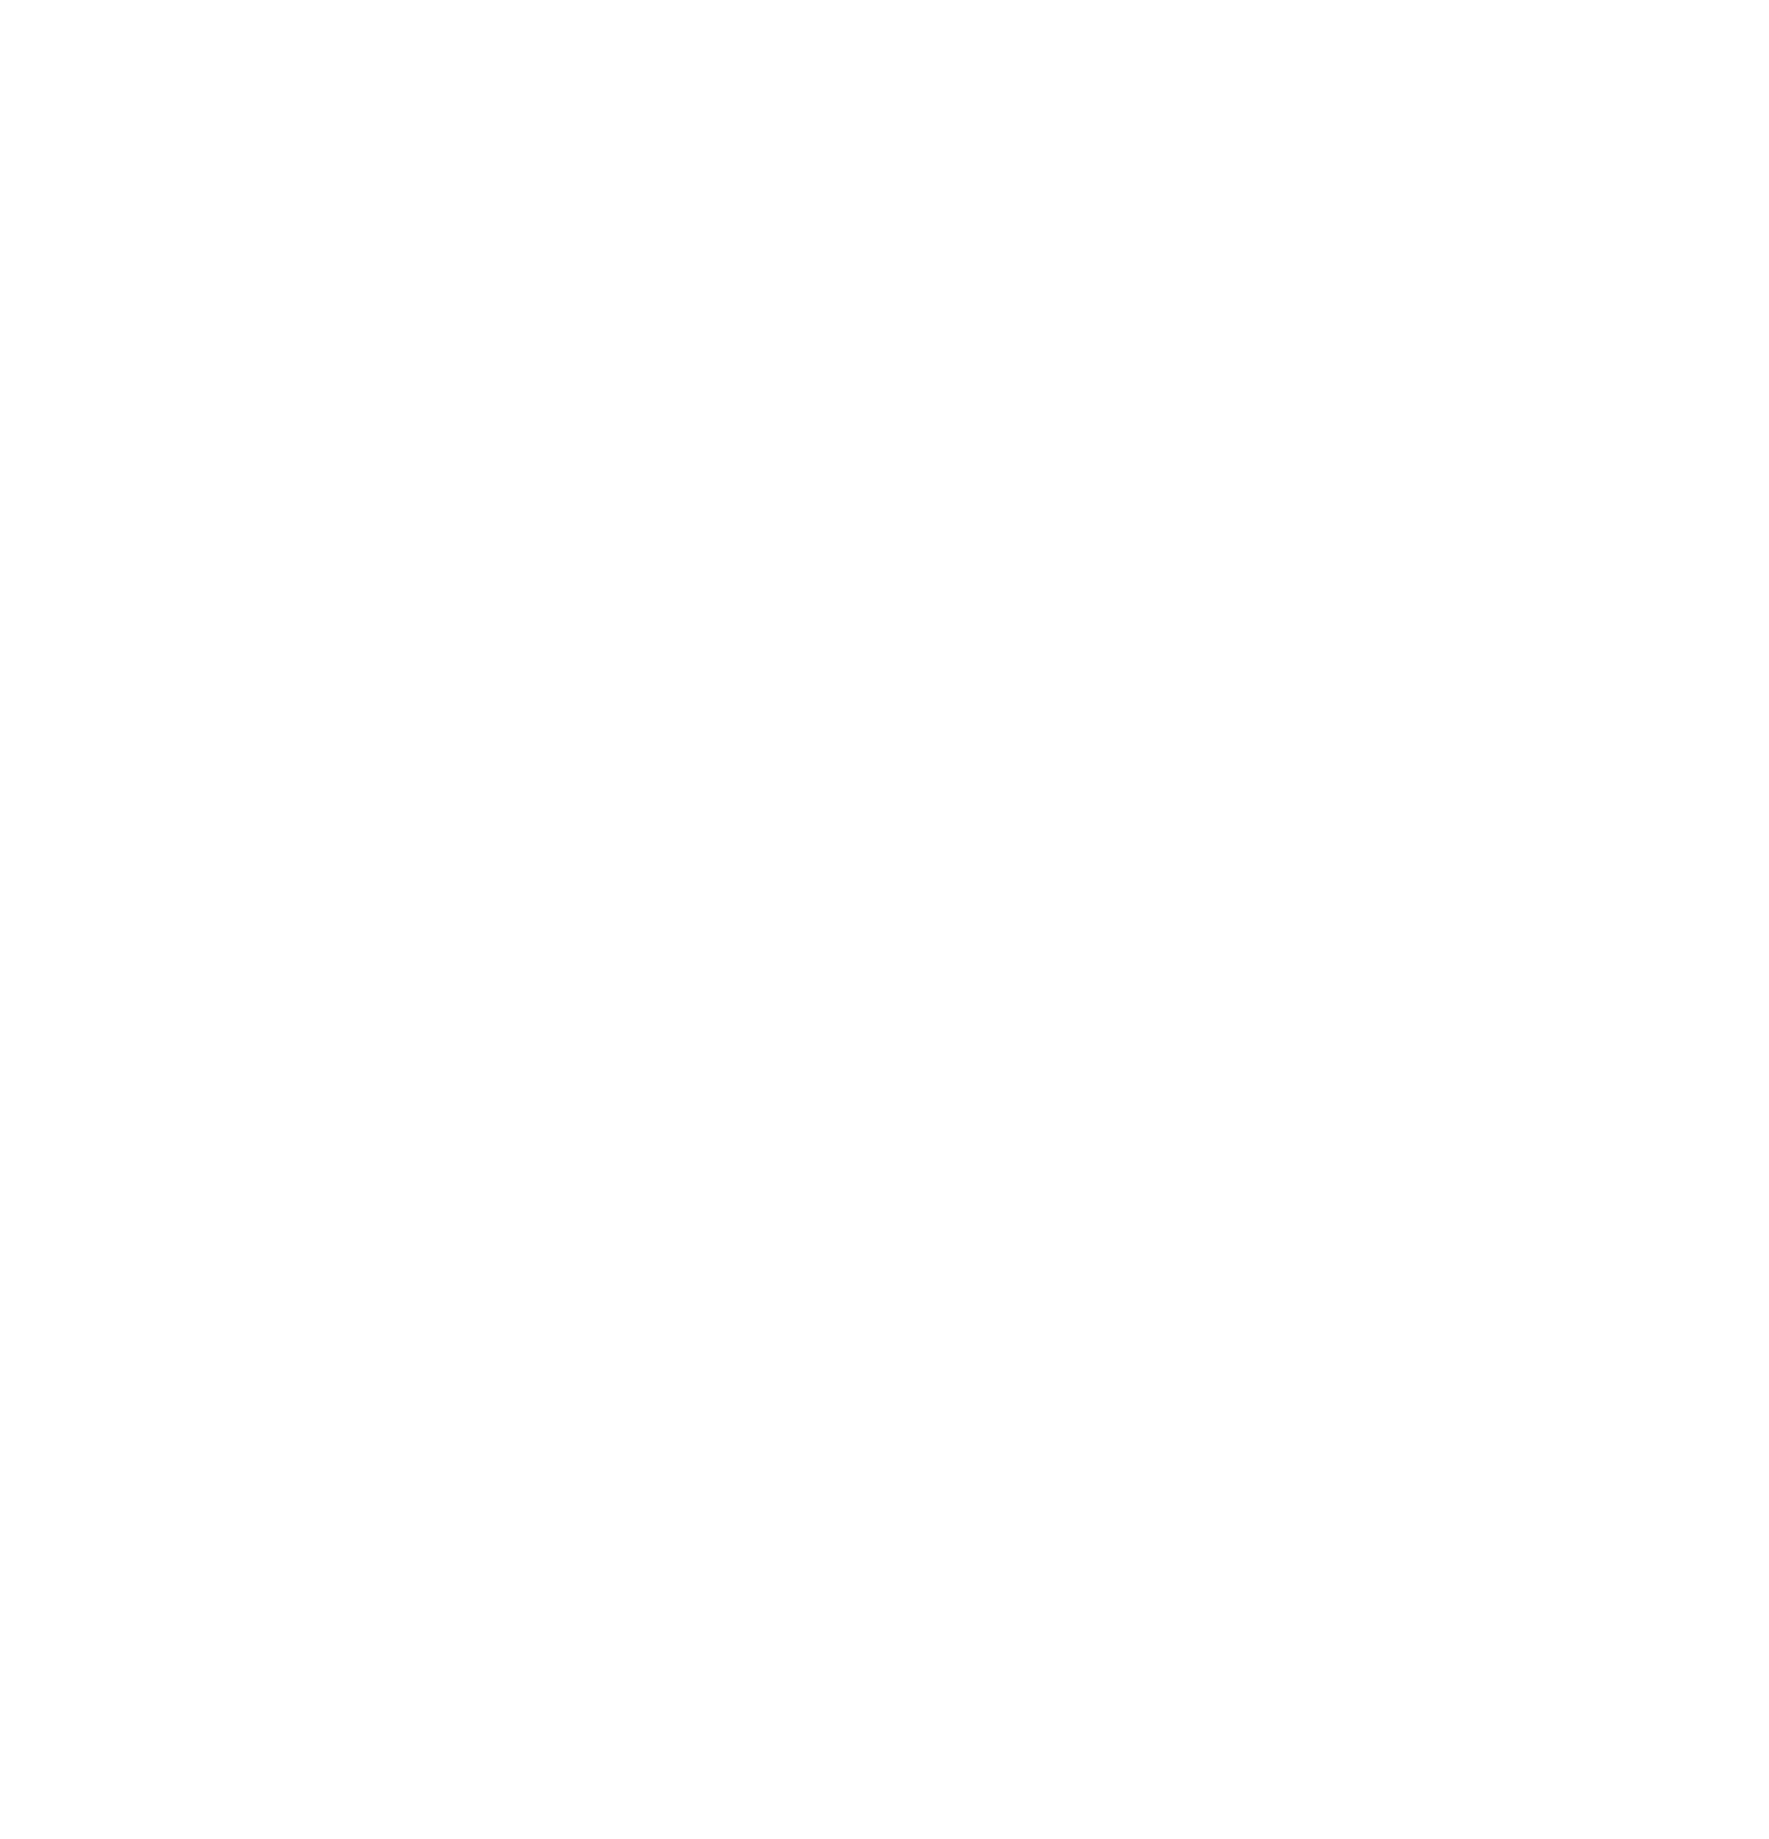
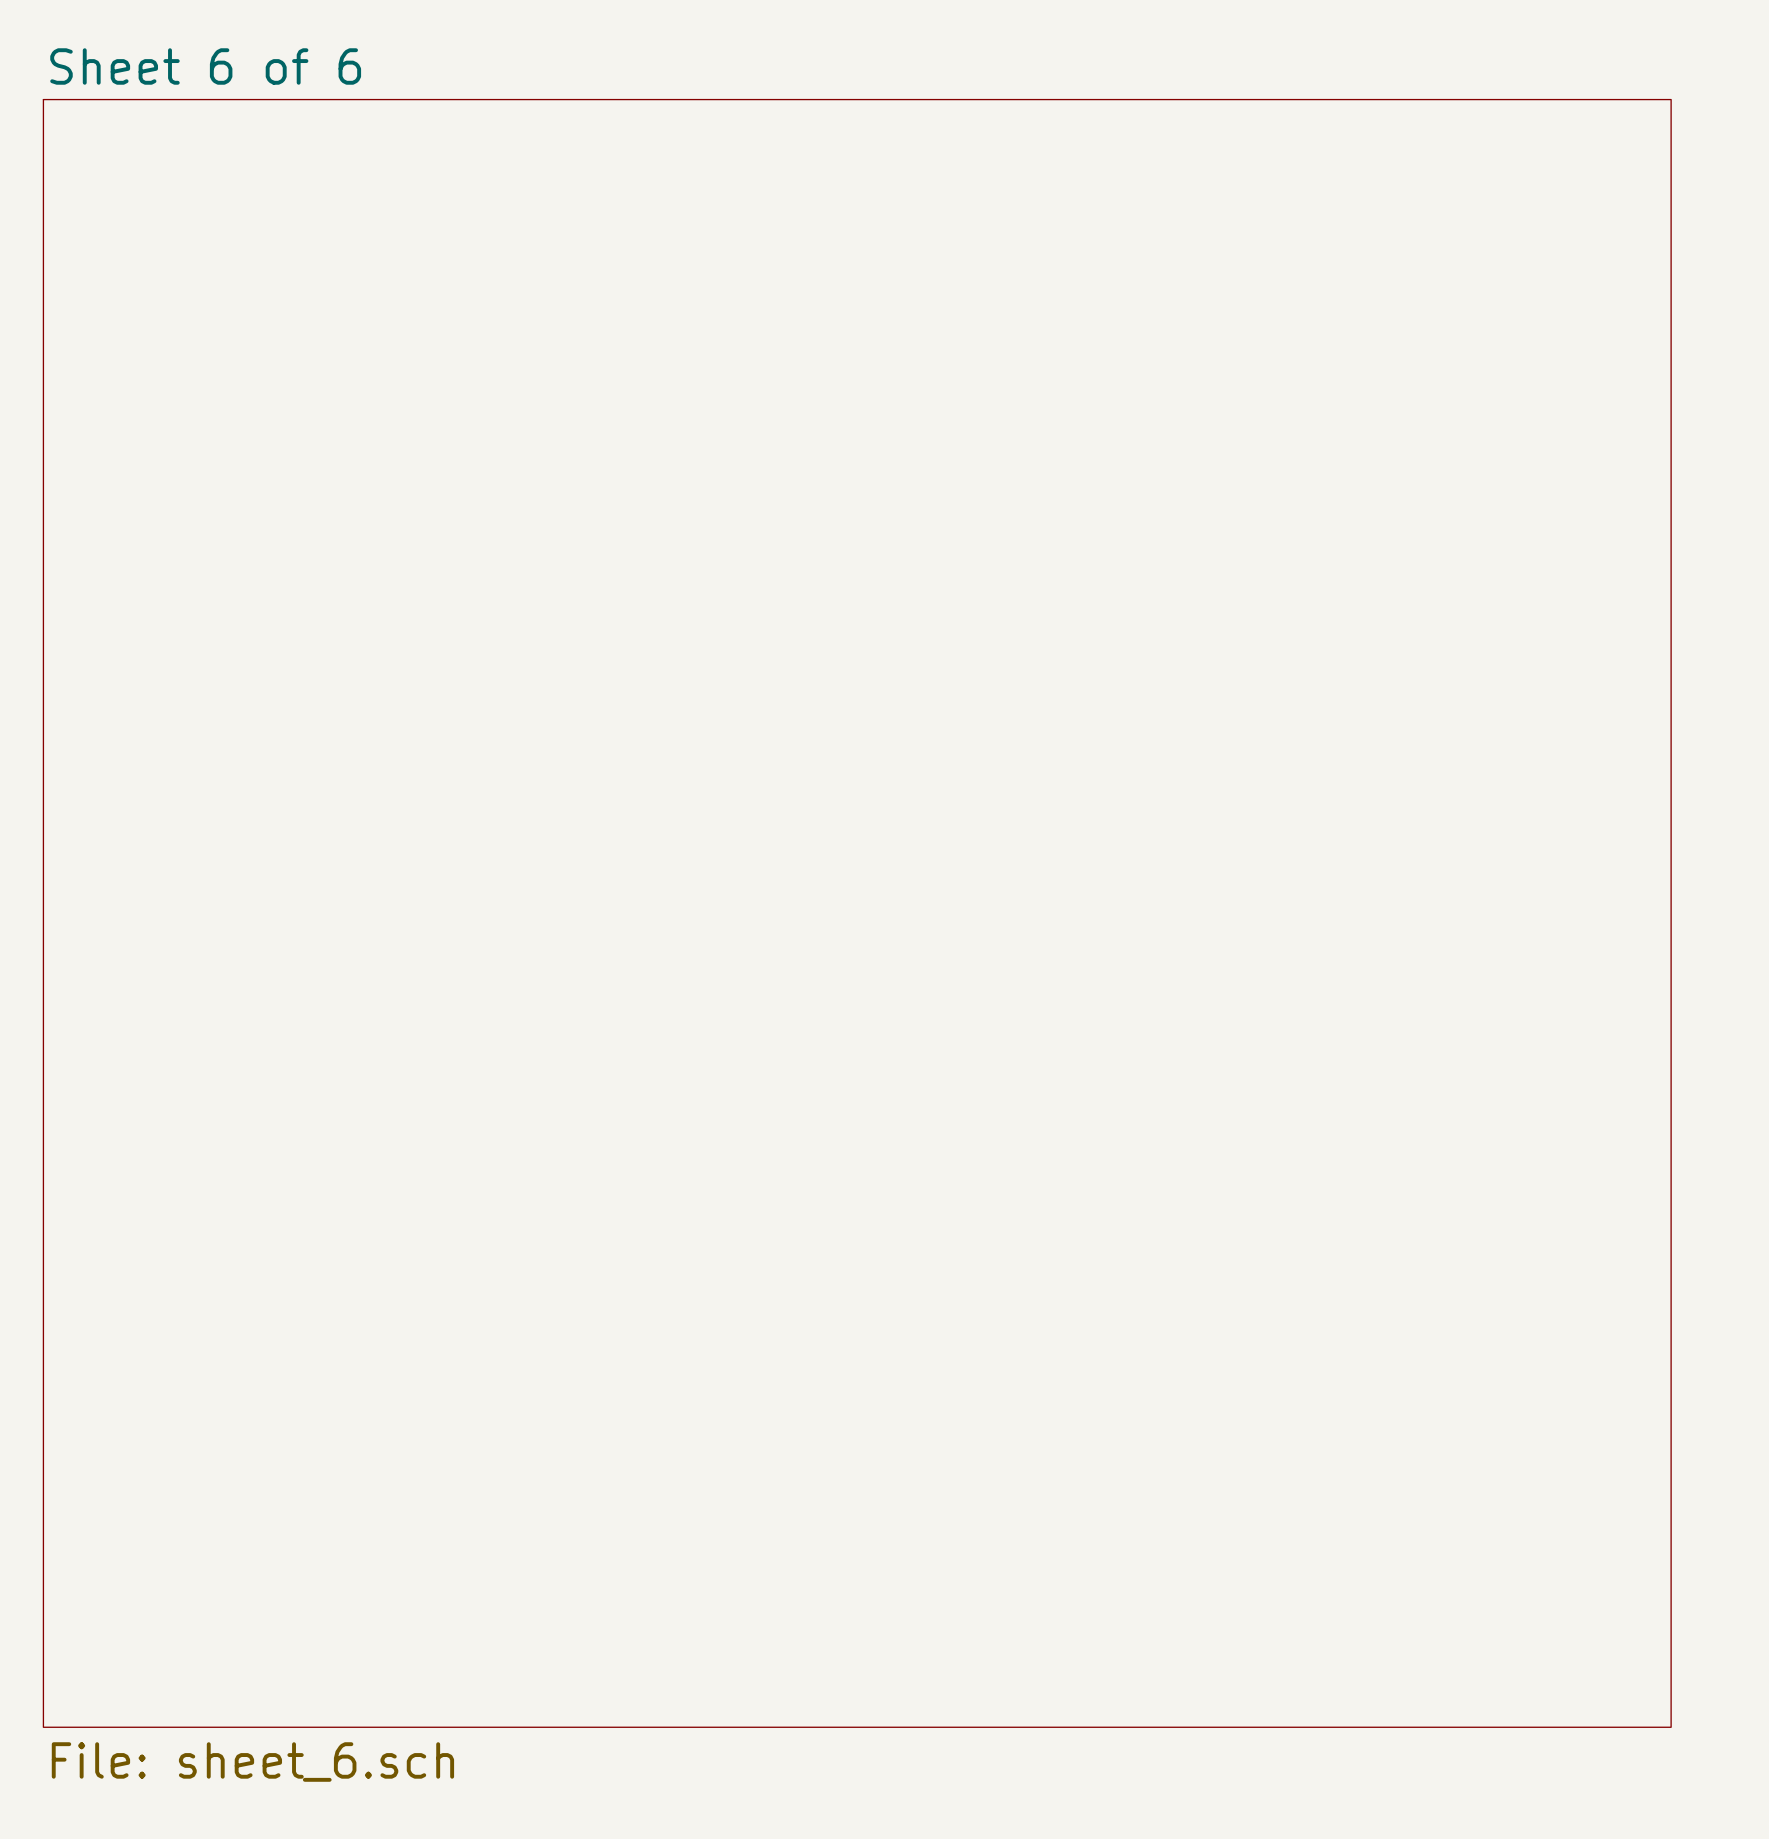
sheet Sheet 6 of 6: none -> File: sheet_6.sch (857, 913)

